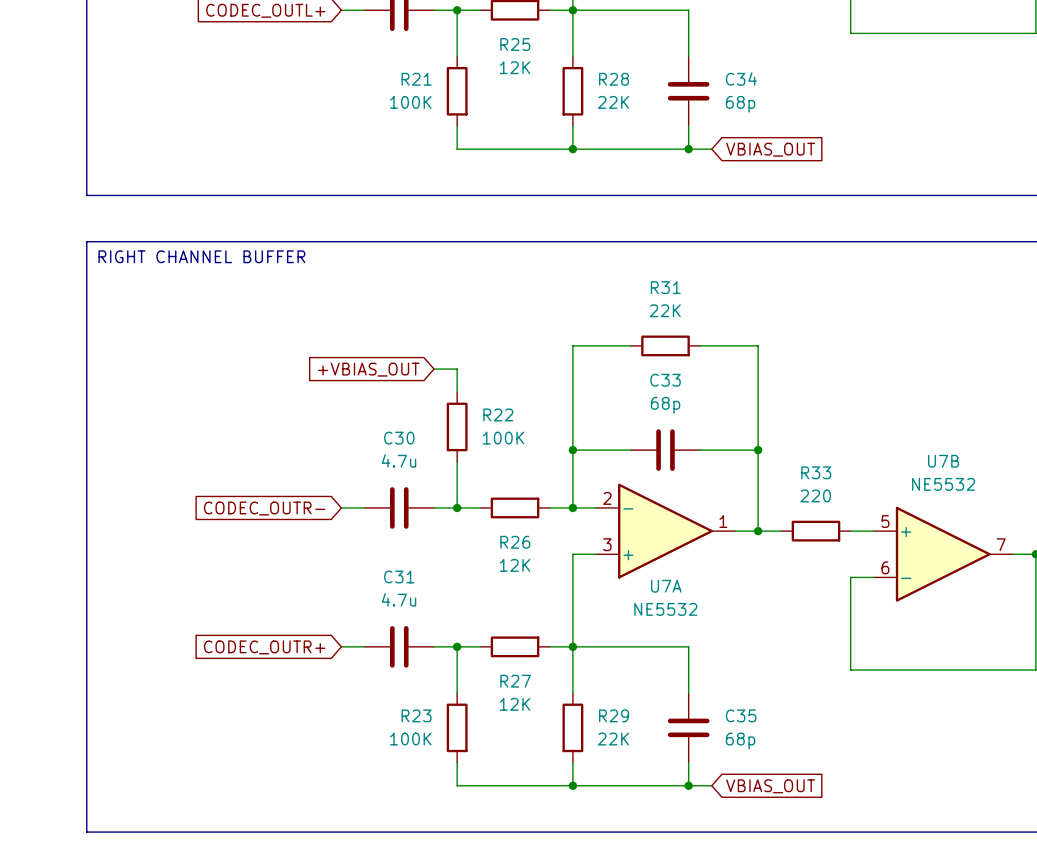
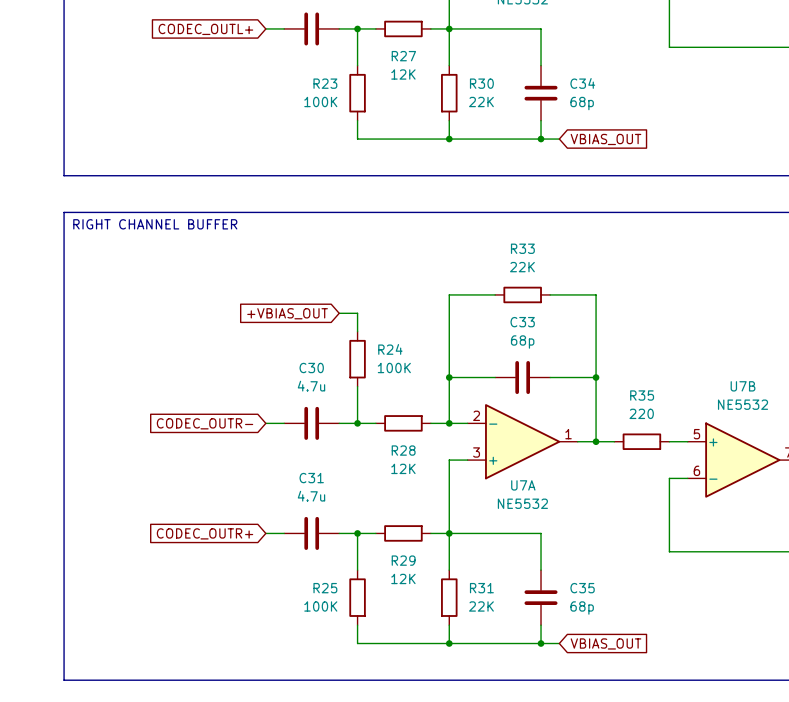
R25 name: R25 (515, 44) -> R27 (403, 56)
R21 name: R21 (416, 79) -> R23 (325, 83)
R28 name: R28 (614, 79) -> R30 (481, 83)
R31 name: R31 (665, 287) -> R33 (522, 248)
R22 name: R22 (498, 414) -> R24 (390, 349)
R33 name: R33 (816, 472) -> R35 (642, 395)
R26 name: R26 (515, 542) -> R28 (403, 450)
R27 name: R27 (515, 681) -> R29 (403, 560)
R23 name: R23 (416, 715) -> R25 (325, 588)
R29 name: R29 (614, 715) -> R31 (481, 588)

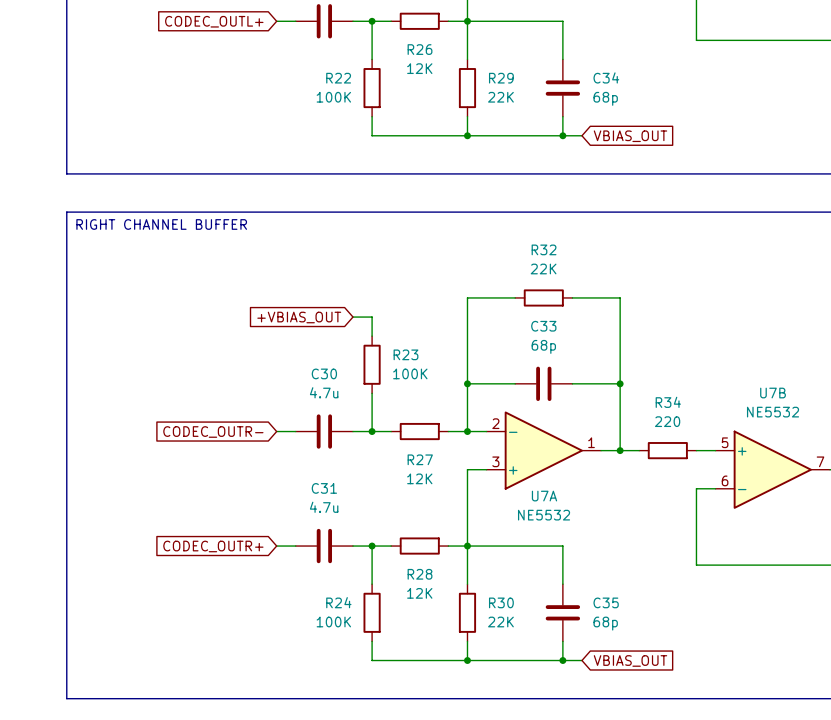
R27 name: R27 (403, 56) -> R26 (420, 49)
R23 name: R23 (325, 83) -> R22 (338, 78)
R30 name: R30 (481, 83) -> R29 (501, 78)
R33 name: R33 (522, 248) -> R32 (544, 249)
R24 name: R24 (390, 349) -> R23 (405, 354)
R35 name: R35 (642, 395) -> R34 (668, 402)
R28 name: R28 (403, 450) -> R27 (420, 459)
R29 name: R29 (403, 560) -> R28 (420, 574)
R25 name: R25 (325, 588) -> R24 (338, 602)
R31 name: R31 (481, 588) -> R30 (501, 602)

